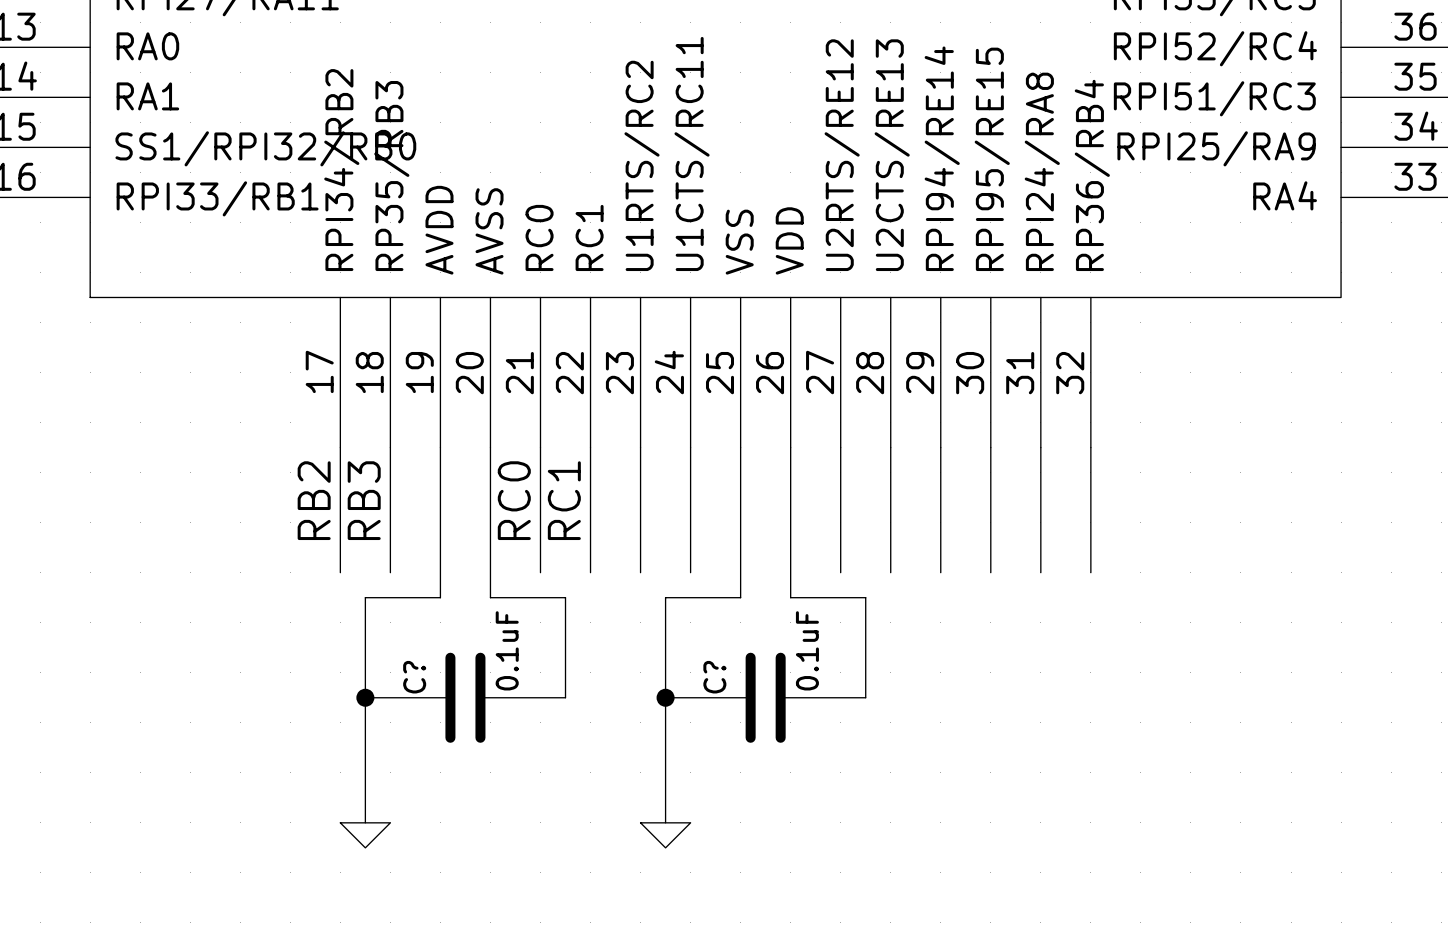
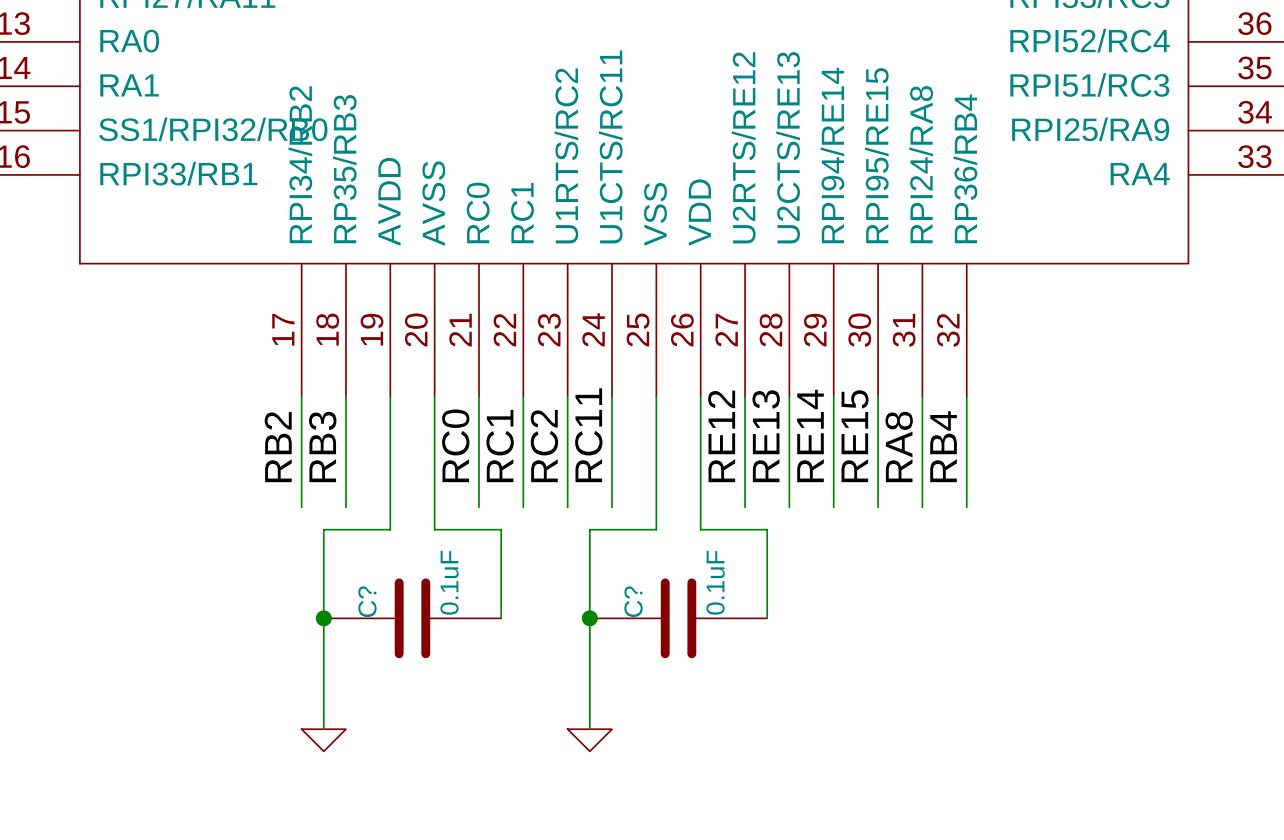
label: none -> RC11 (588, 435)
label: none -> RE12 (721, 436)
label: none -> RE13 (766, 436)
label: none -> RE14 (810, 435)
label: none -> RE15 (855, 436)
label: none -> RB4 (943, 446)
label: none -> RC2 (544, 446)
label: none -> RA8 (899, 446)

